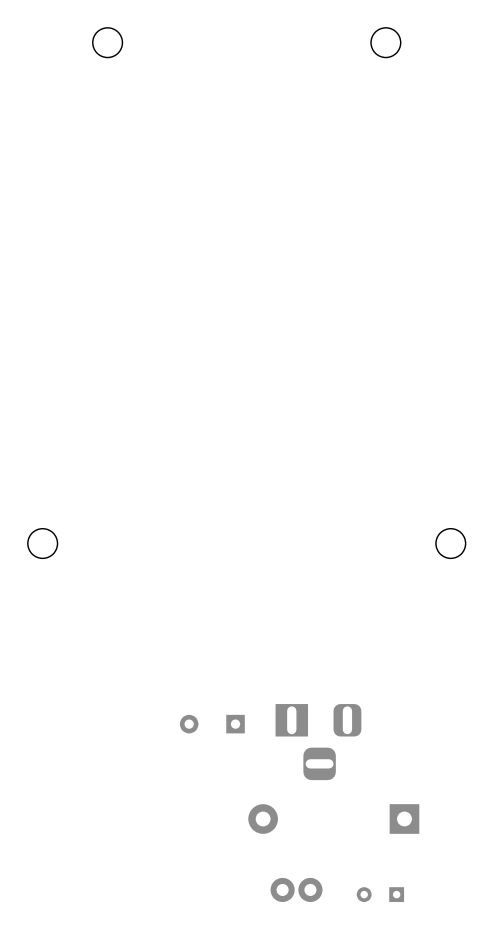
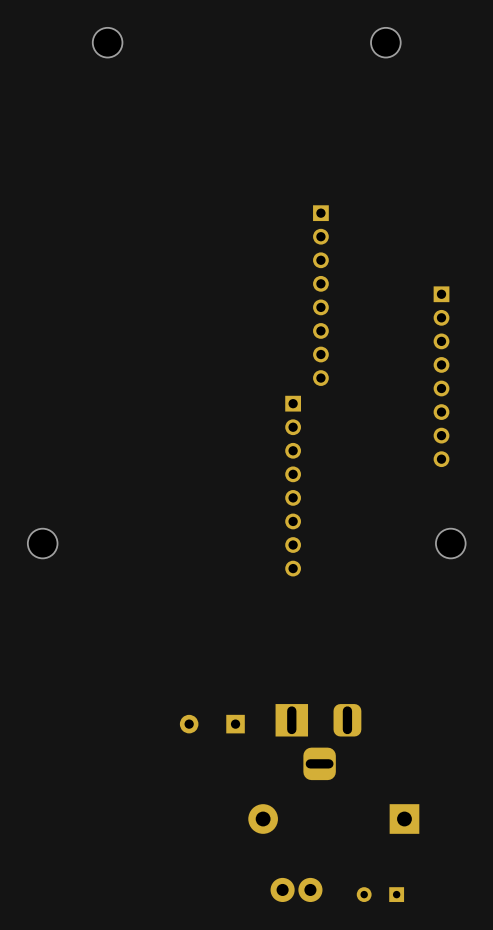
part: none -> (320, 295)
part: none -> (441, 376)
part: none -> (293, 486)

